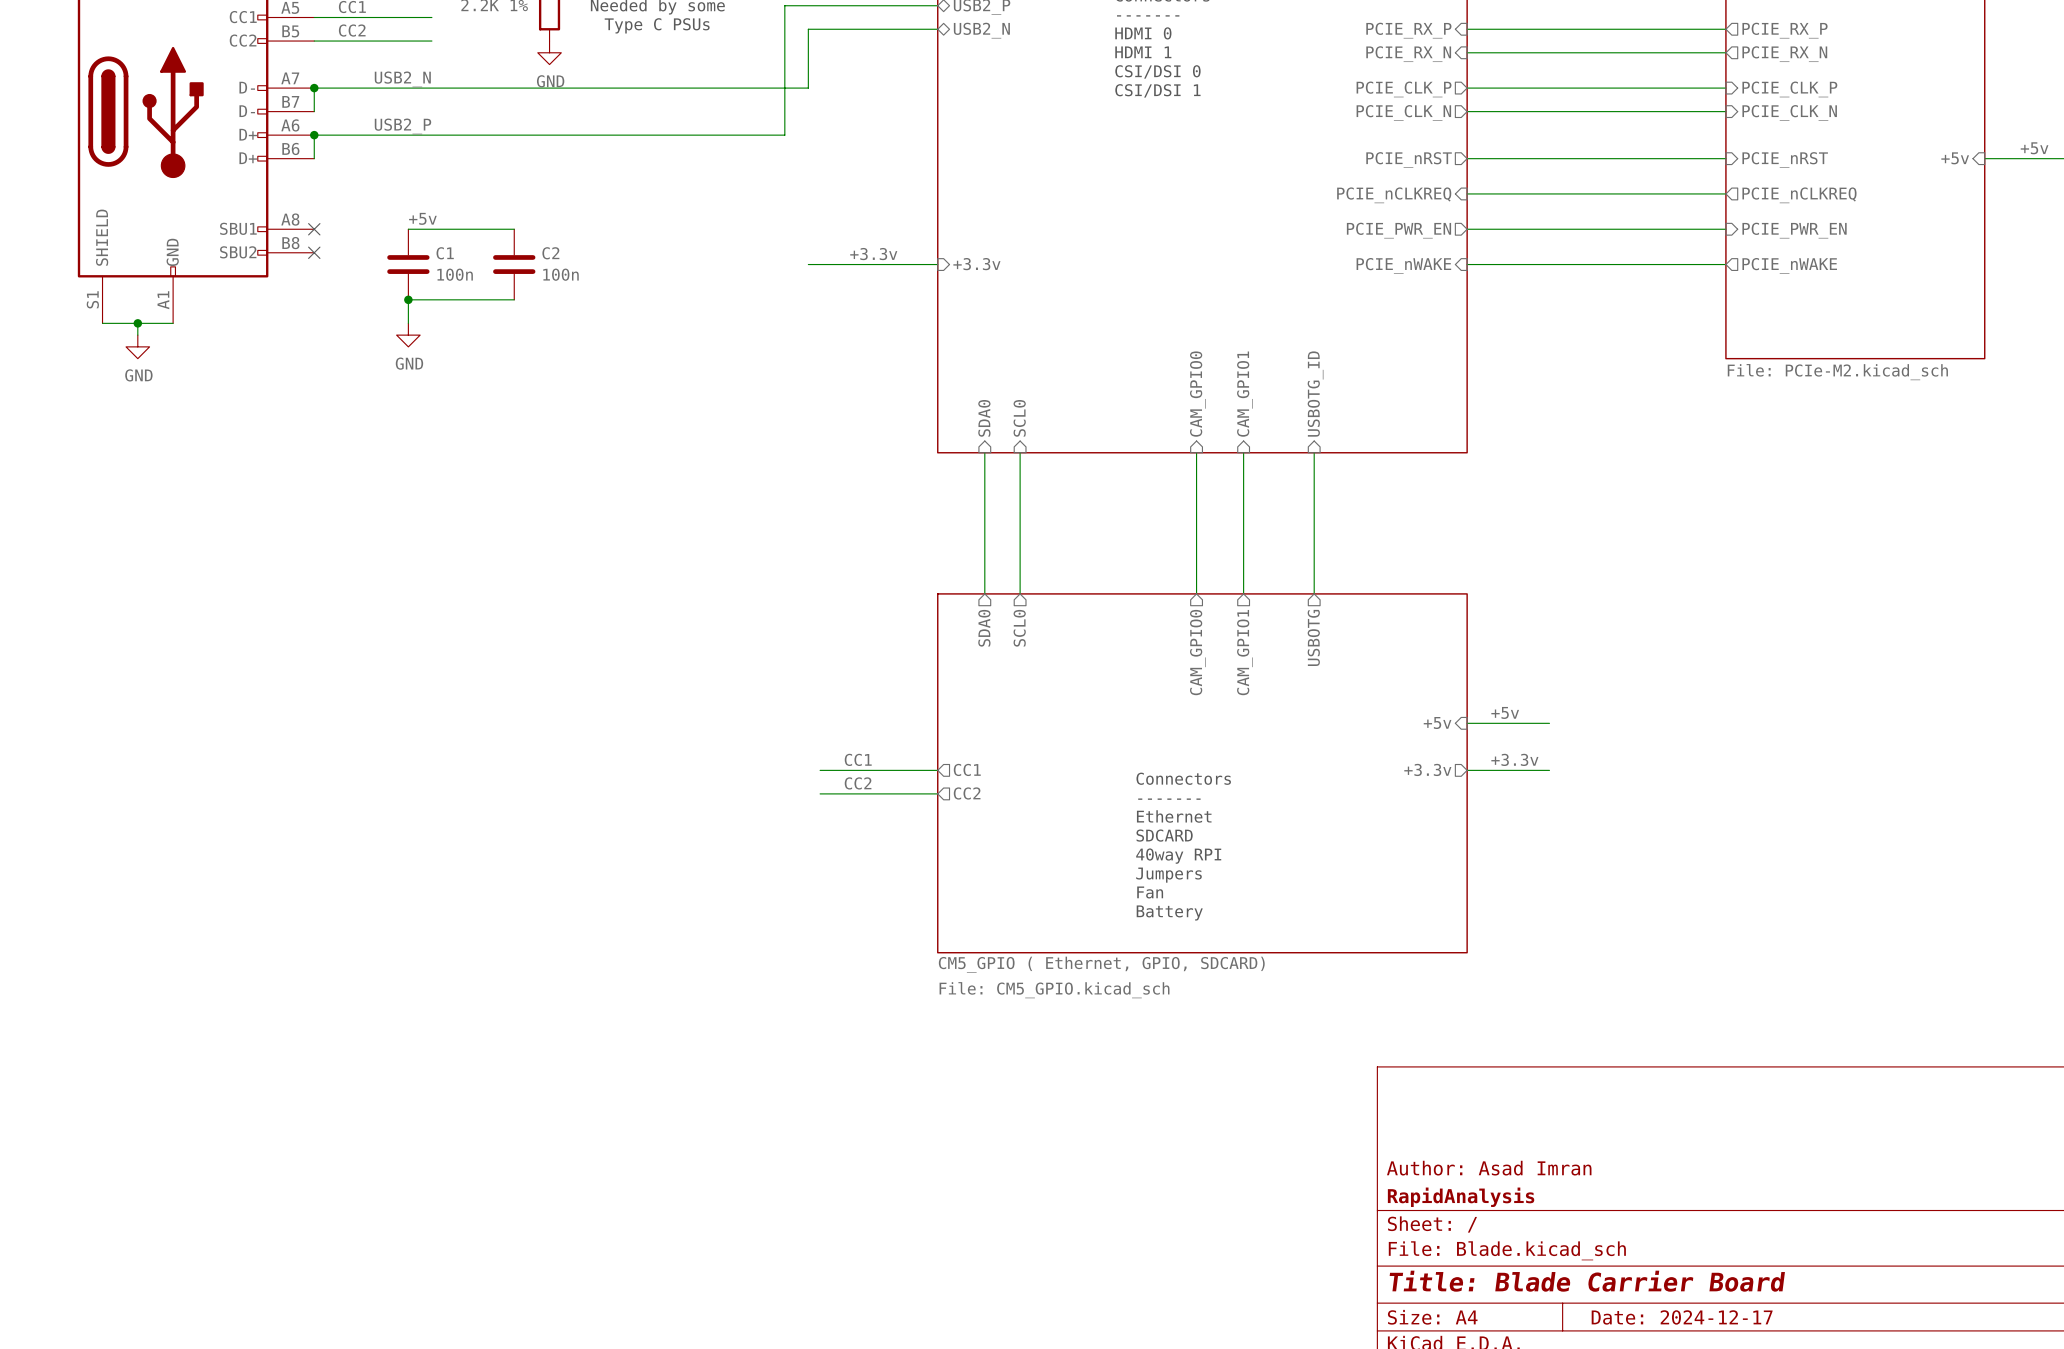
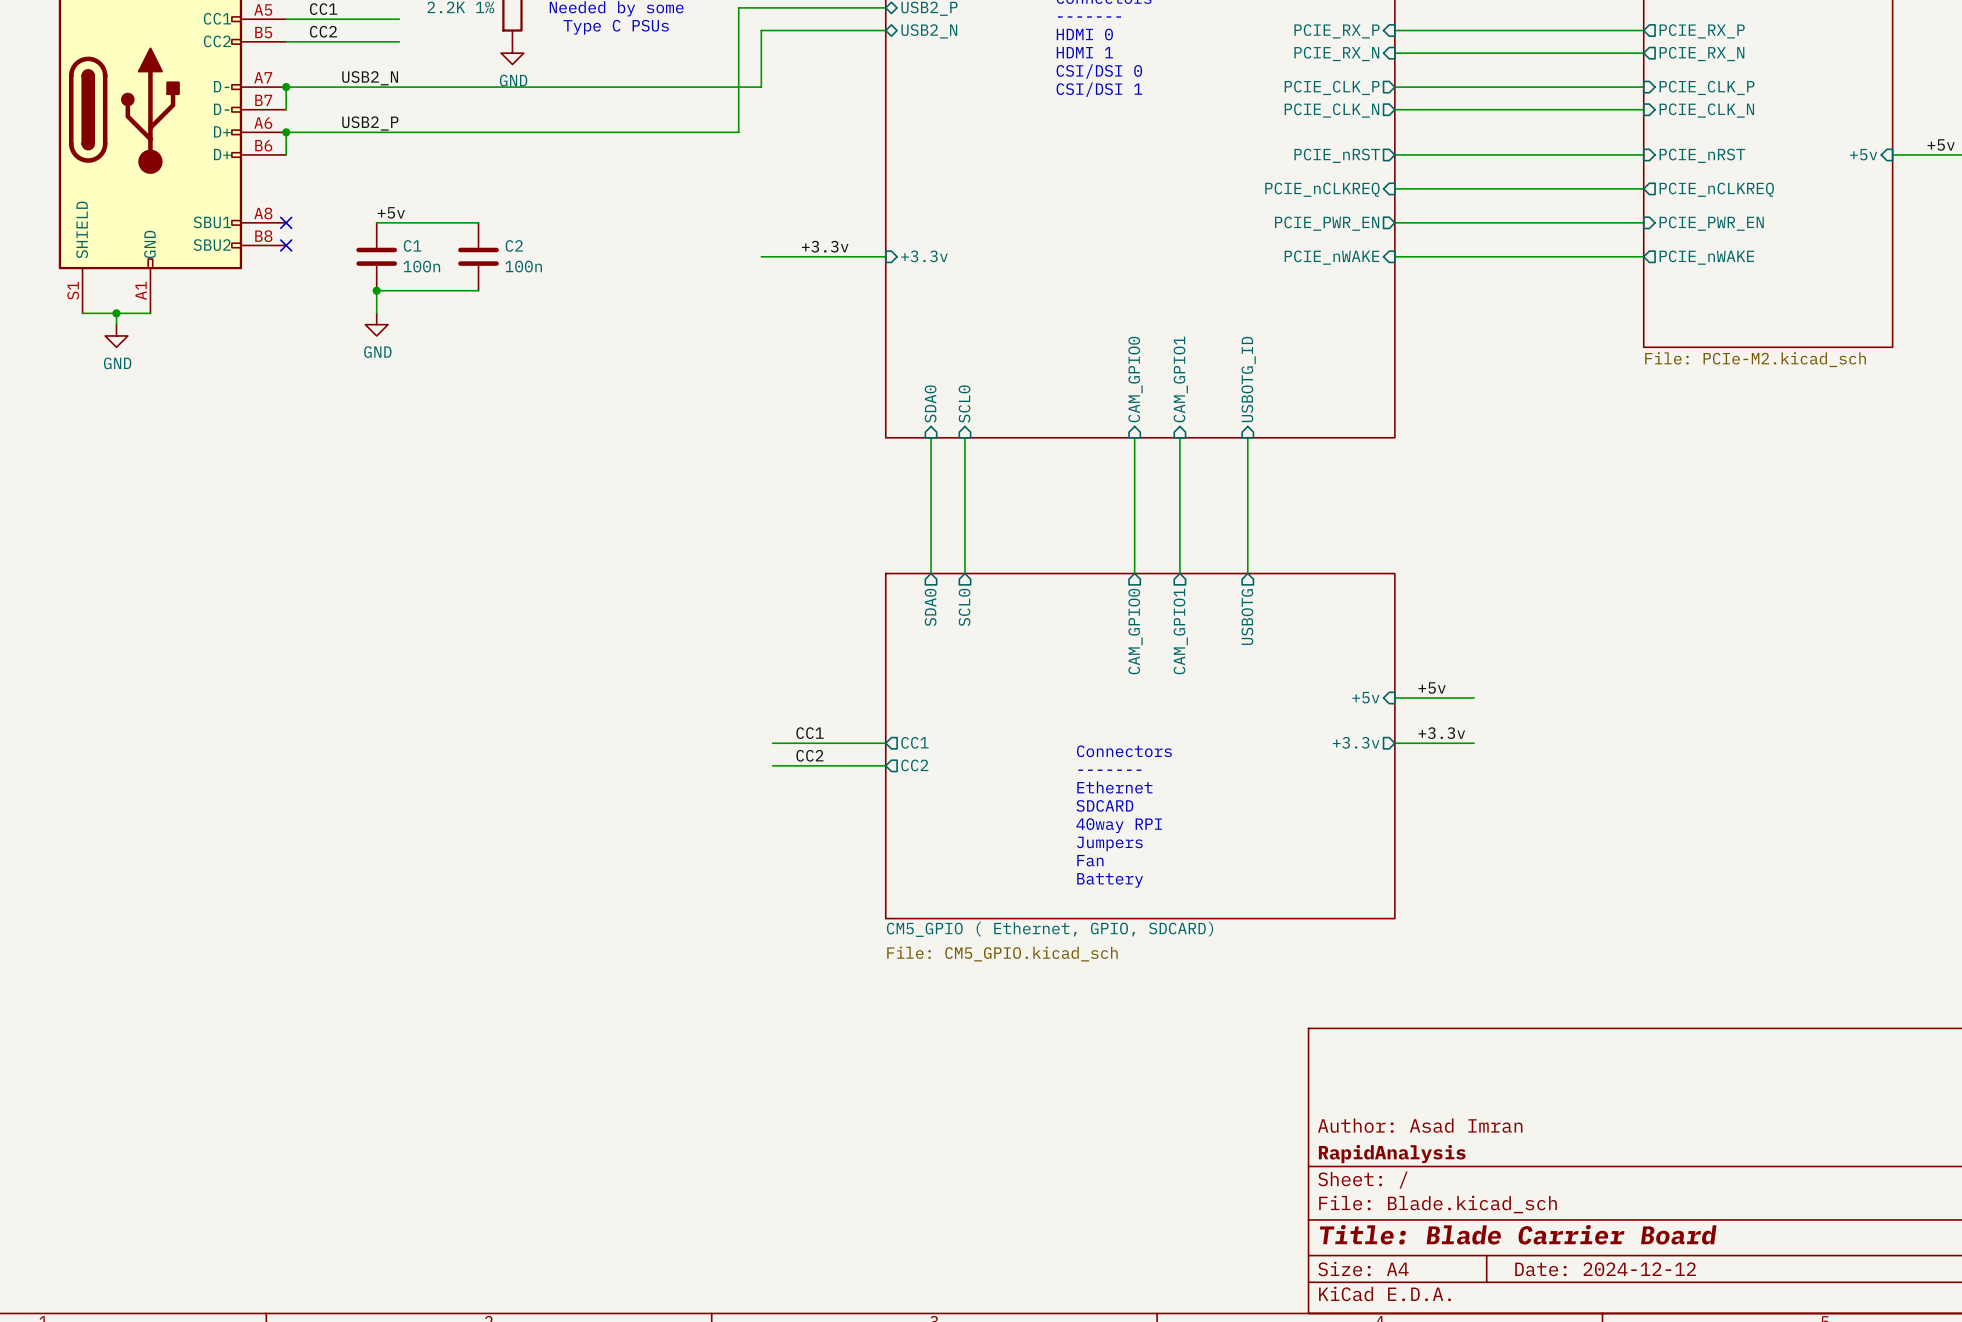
title block: Date: 2024-12-17 (1682, 1317) -> Date: 2024-12-12 (1605, 1269)

